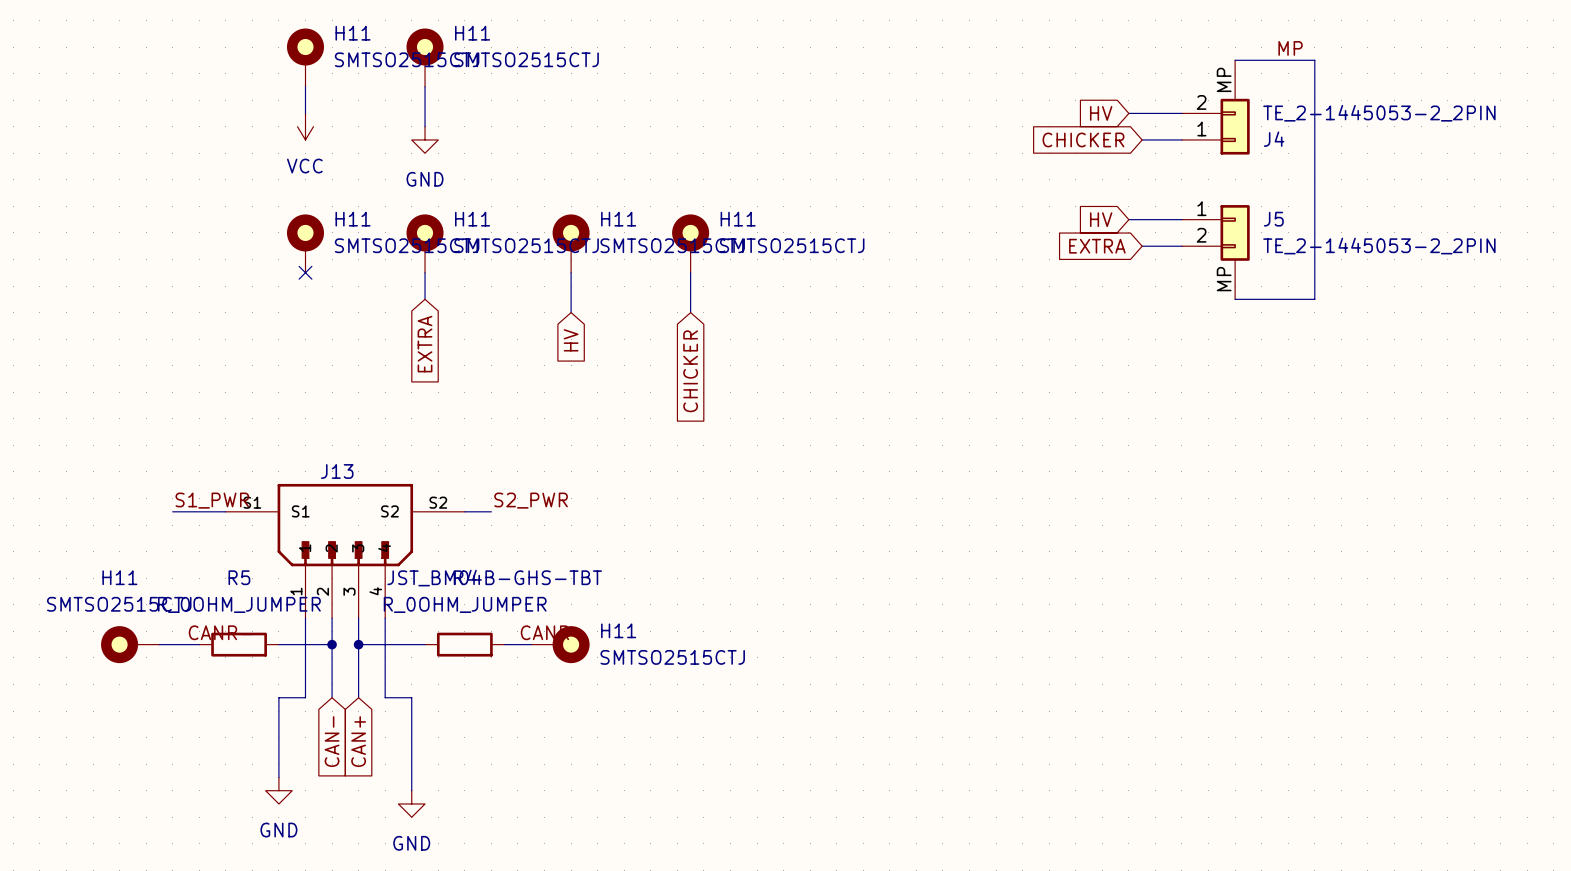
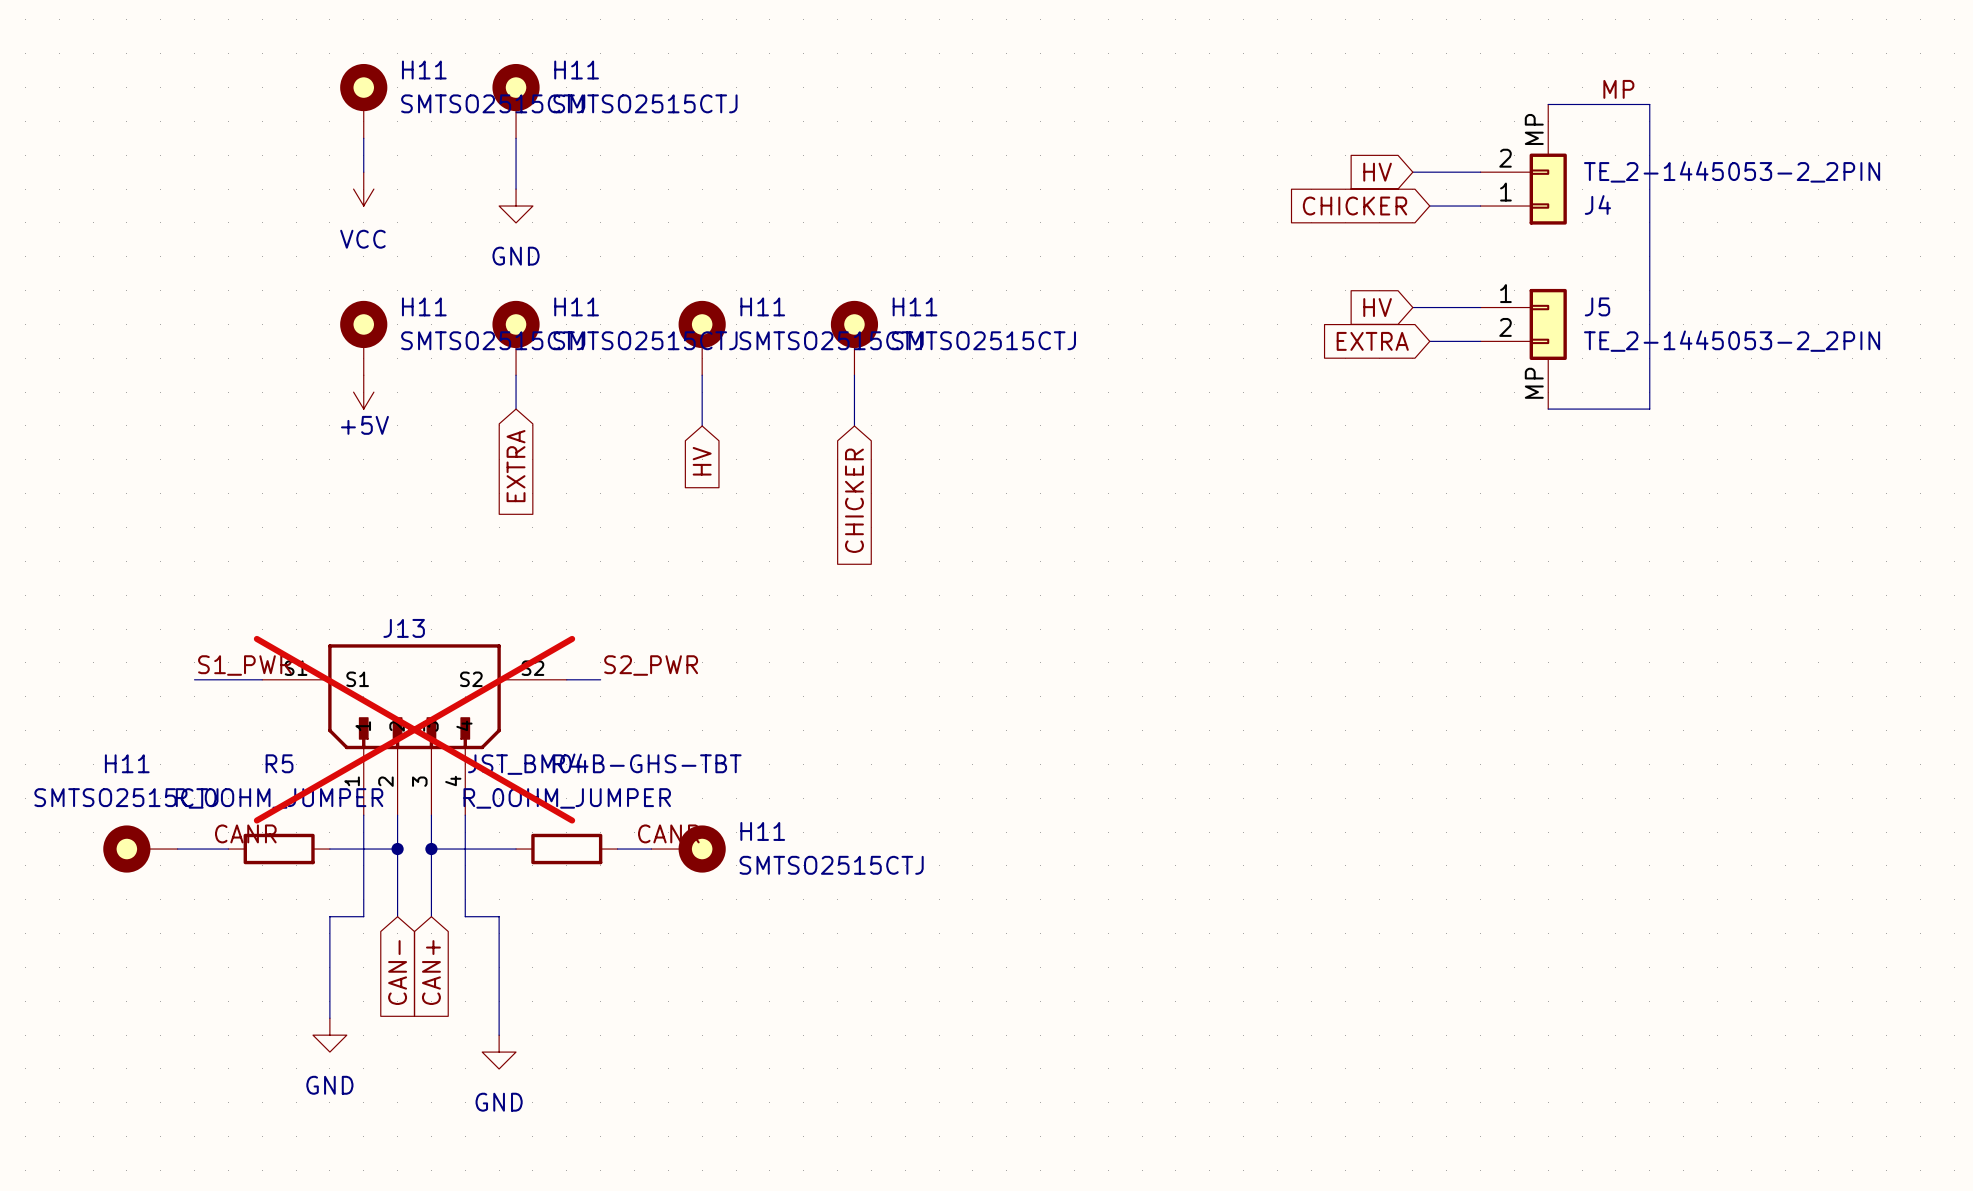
no-connect mark: (305, 272) -> none
power symbol: none -> +5V (363, 392)
J13 do-not-place cross: none -> (414, 729)

